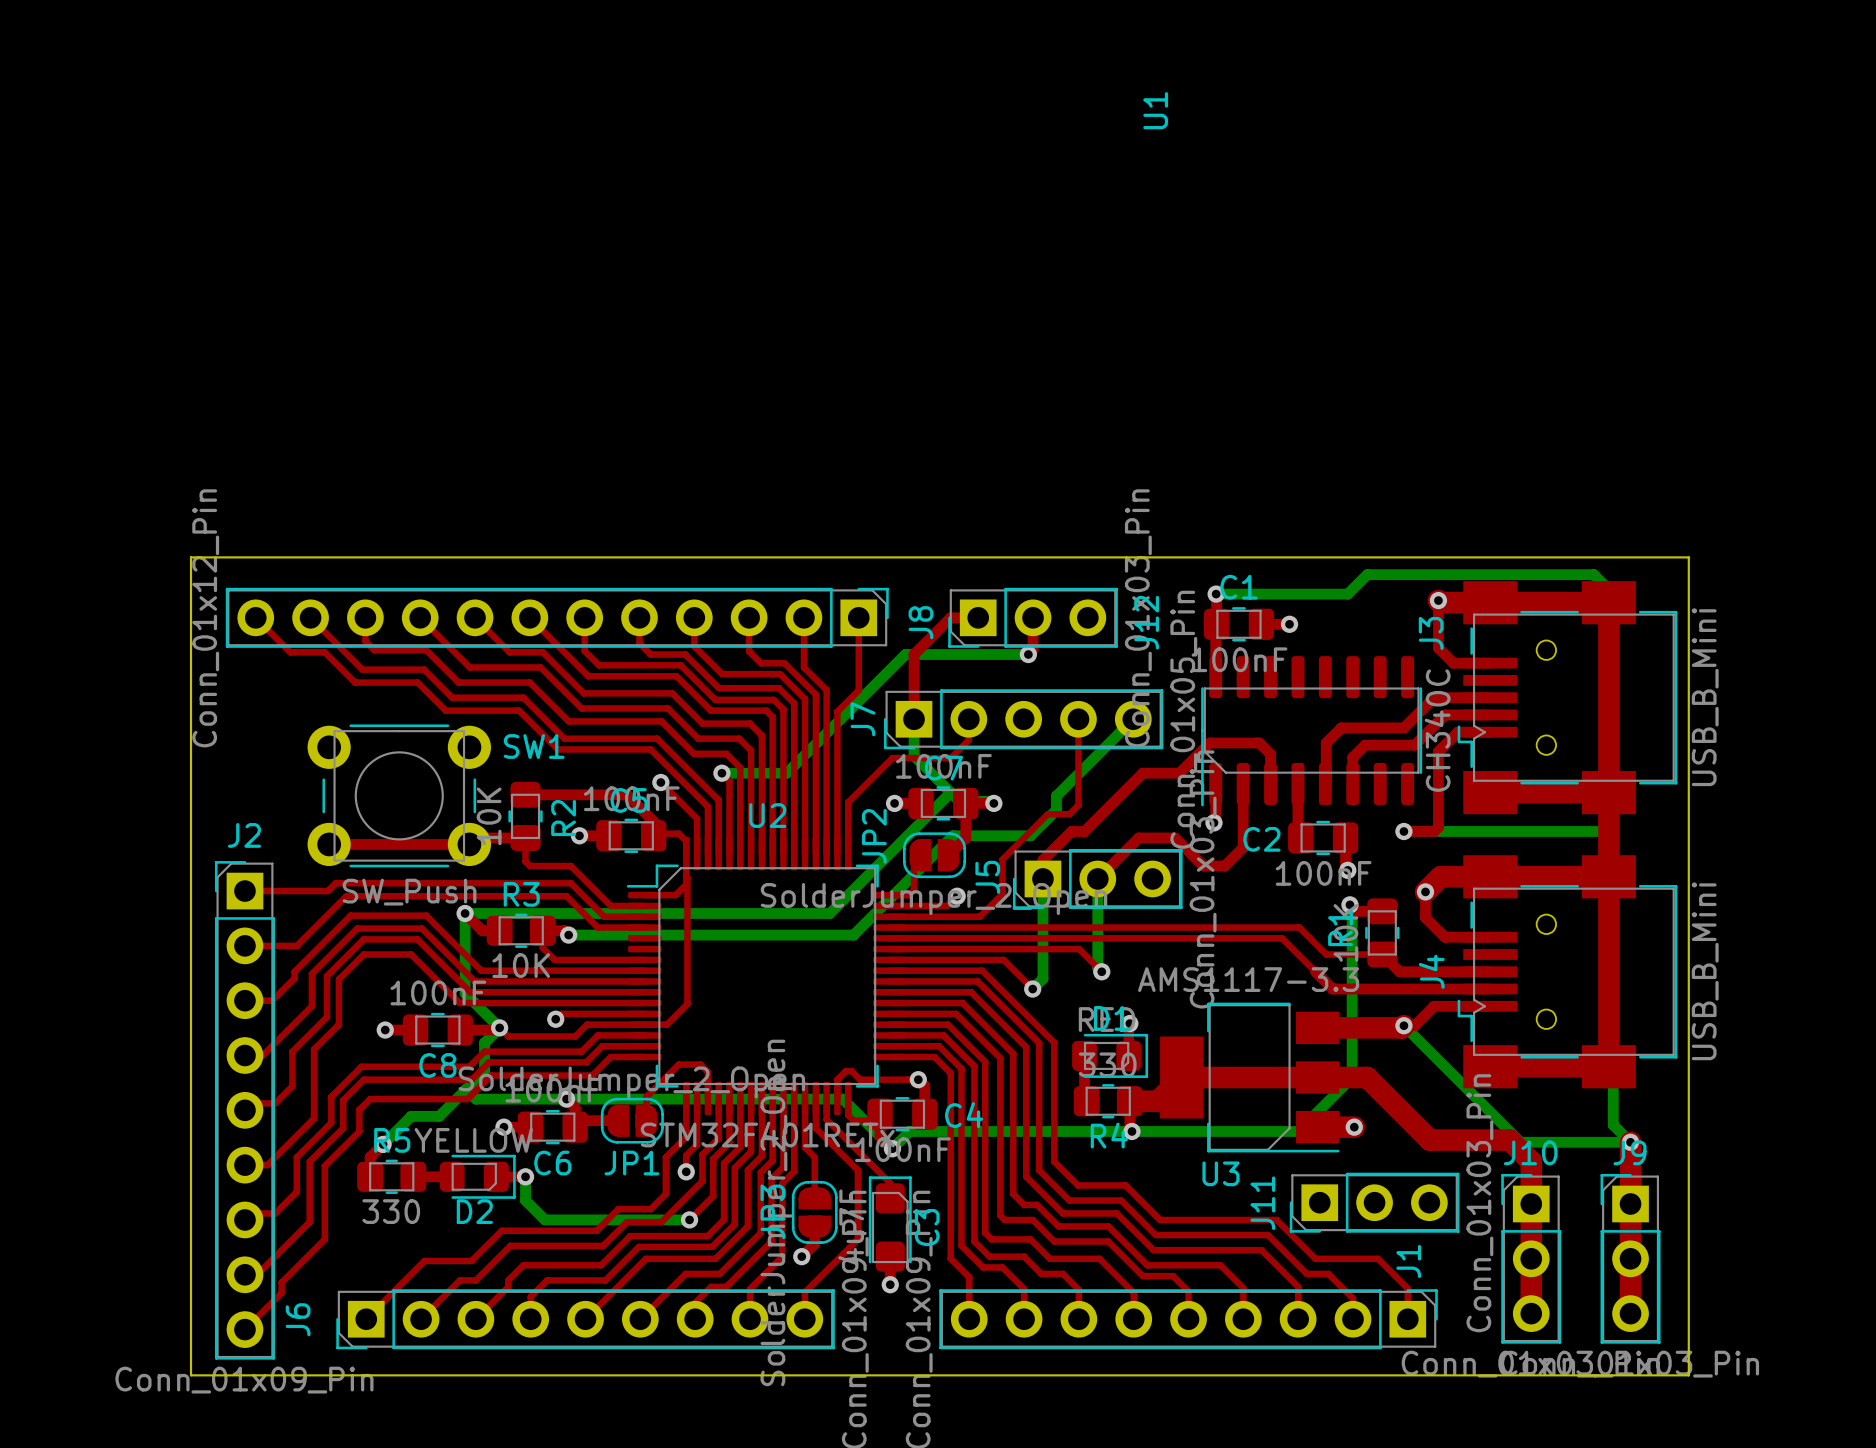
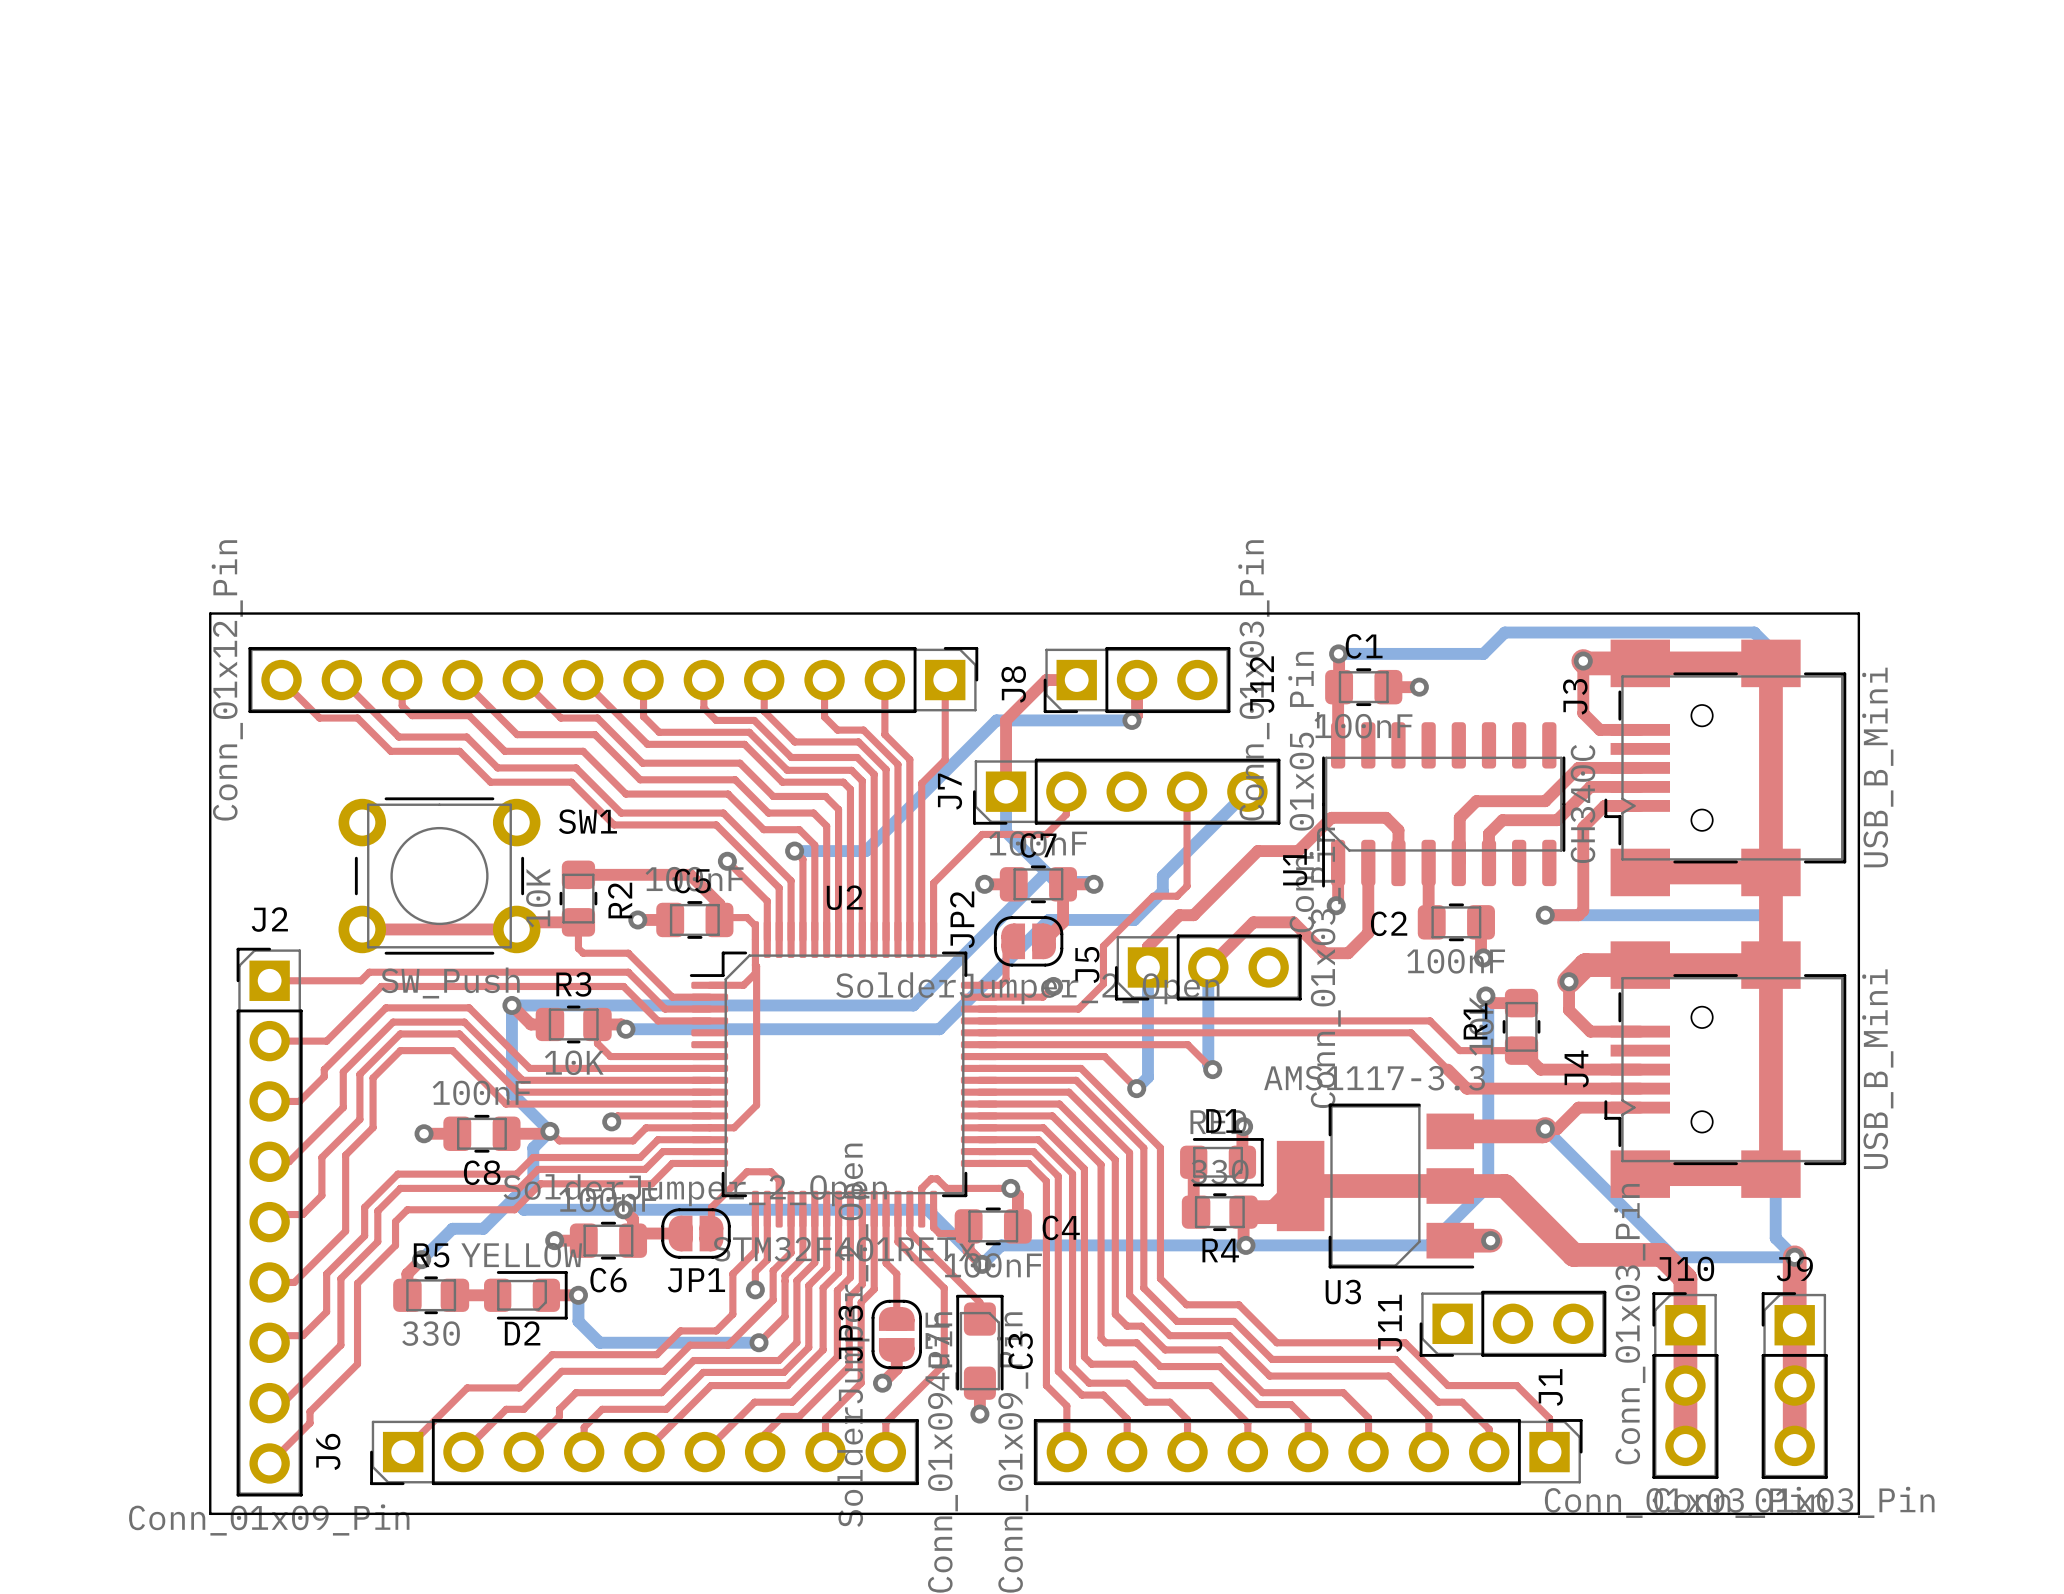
U1 name position: U1 (1155, 110) -> U1 (1295, 867)

